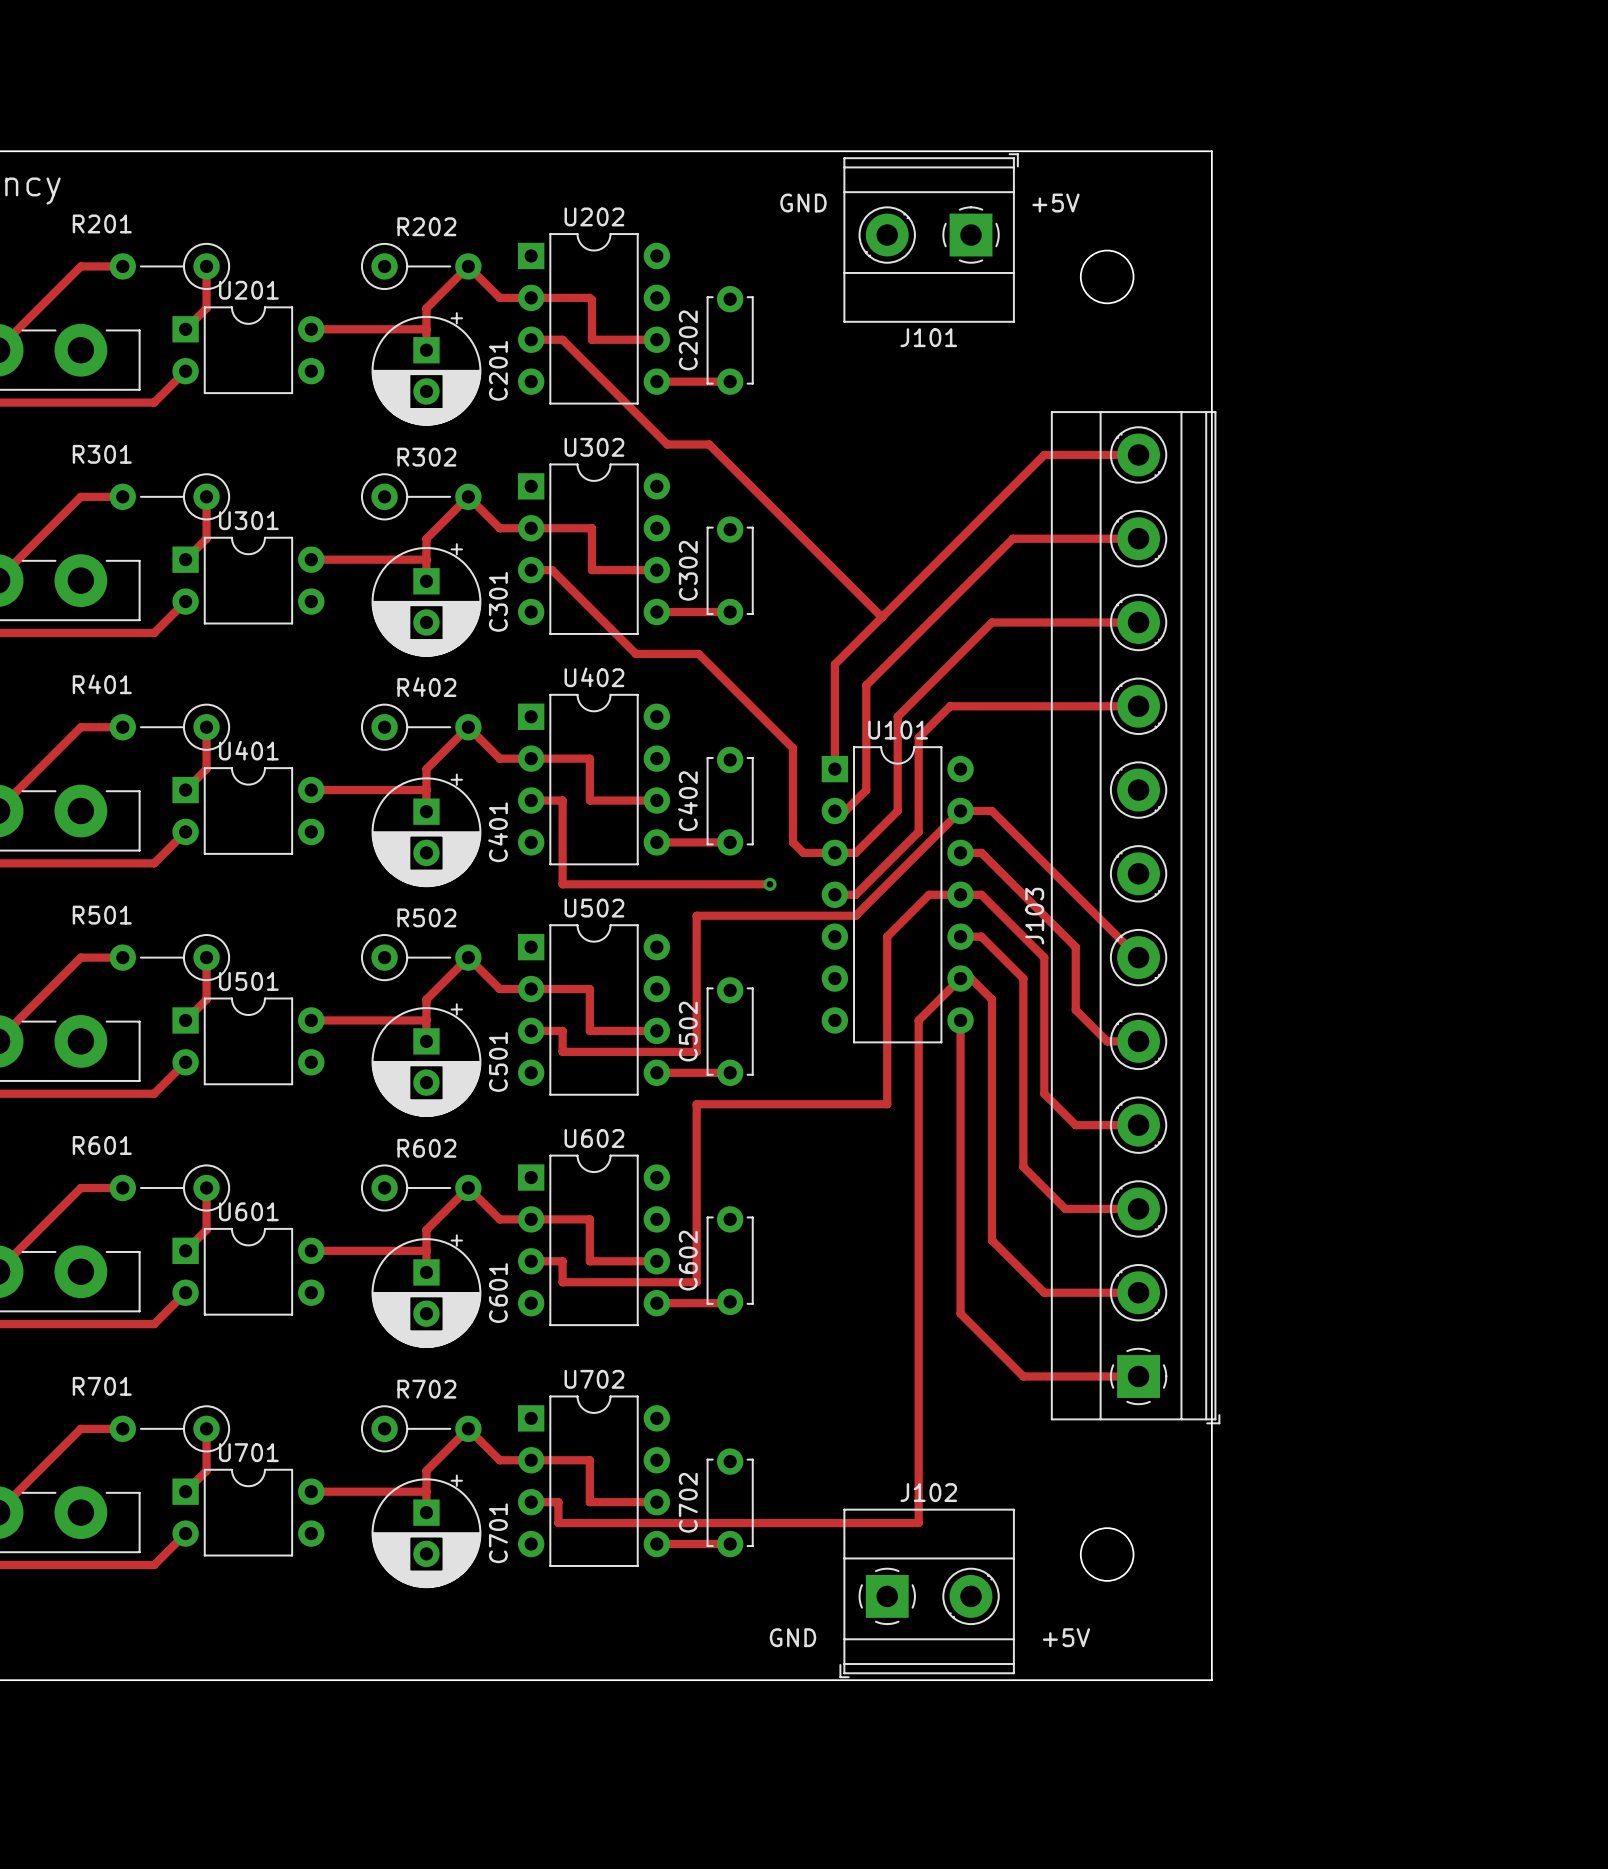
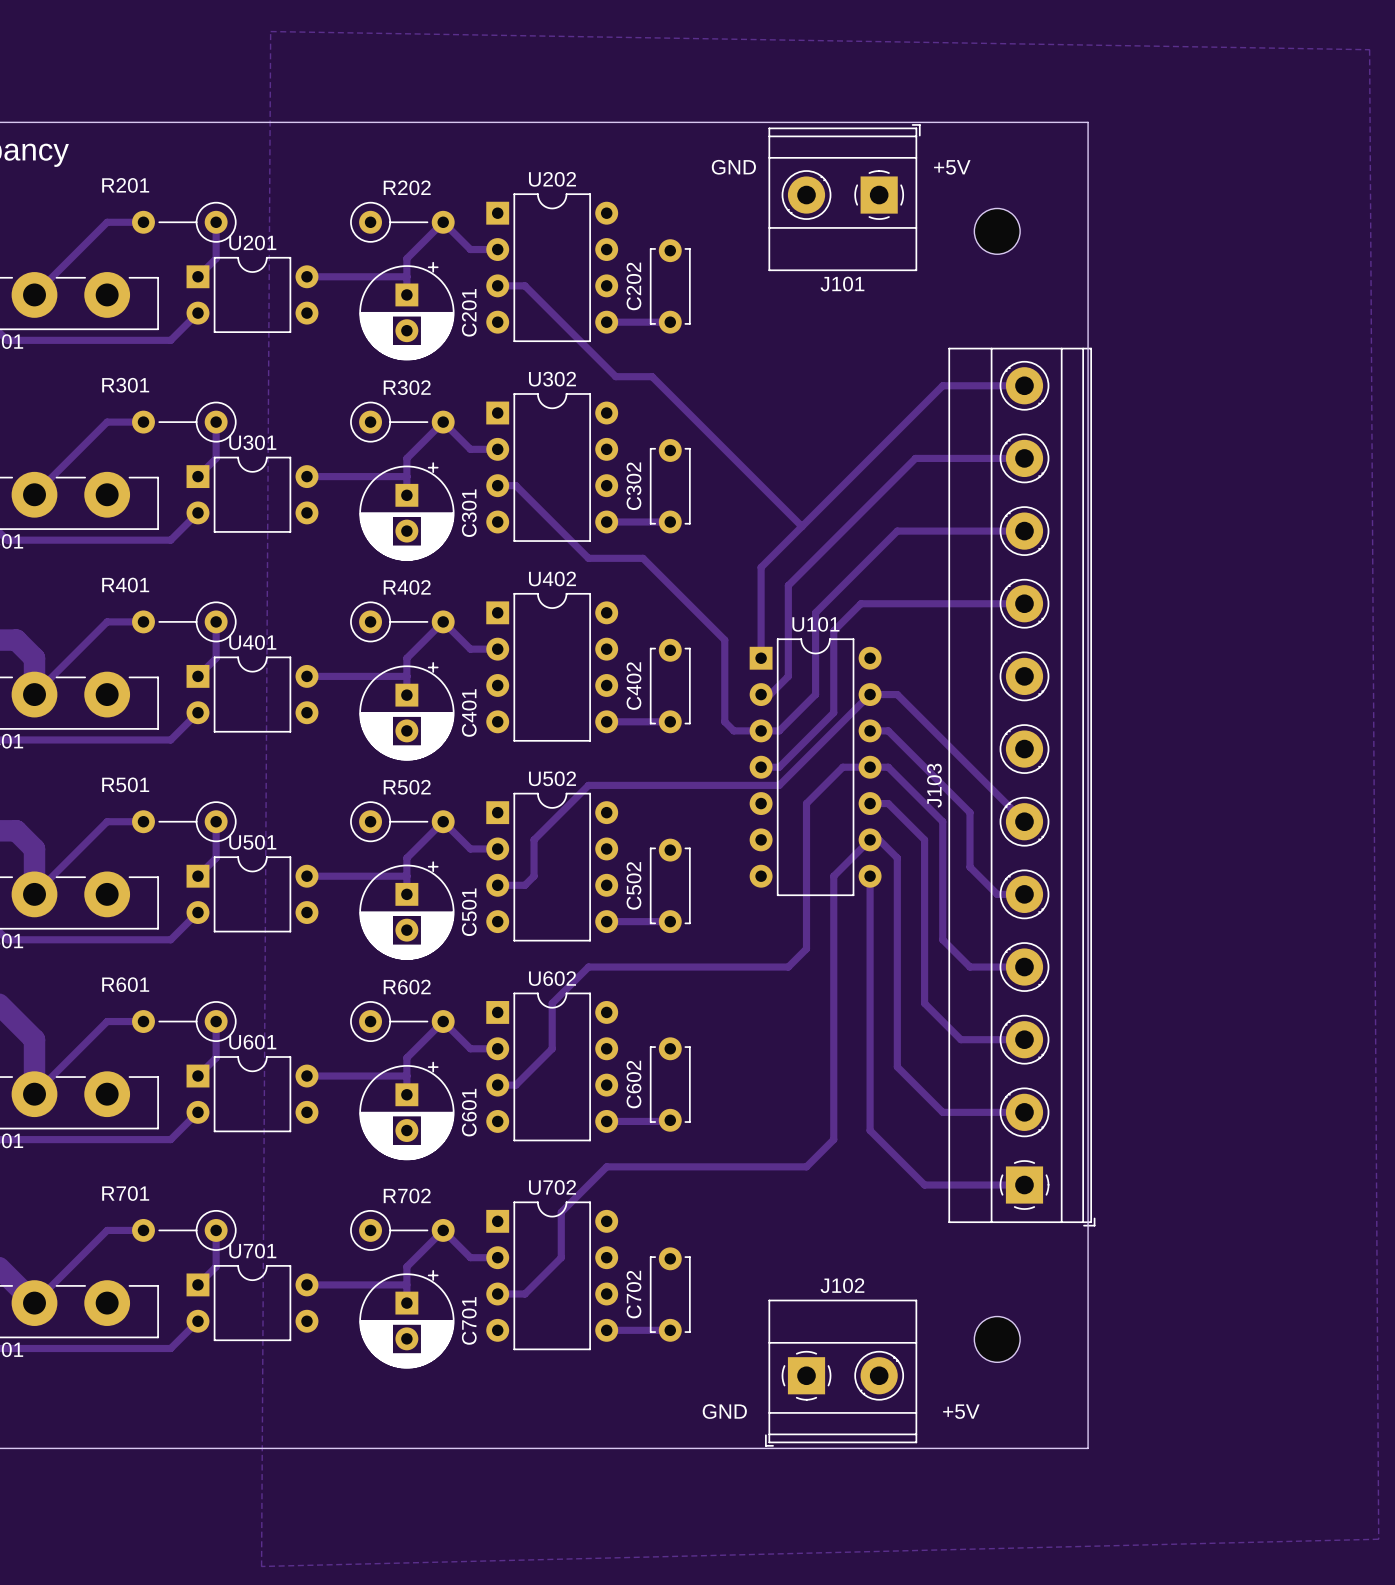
zone outline: none -> (270, 31) (261, 1566) (1378, 1539) (1369, 49) (270, 31)
track: (531, 297) (589, 297) (591, 299) (591, 339) (656, 339) -> none
track: (531, 528) (591, 528) (591, 570) (656, 570) -> none
track: (531, 758) (589, 758) (589, 800) (656, 800) -> none
track: (531, 800) (562, 800) (562, 884) (769, 884) -> none
via: (769, 884) -> none
track: (696, 915) (696, 1051) (562, 1051) (562, 1030) -> (641, 785) (588, 785) (534, 839) (534, 876) (524, 885)
track: (531, 989) (589, 989) (589, 1030) (656, 1030) -> none
track: (887, 1104) (696, 1104) (696, 1282) (562, 1282) (562, 1261) (552, 1261) -> (806, 948) (788, 967) (588, 967) (552, 1003) (552, 1048) (515, 1085)
track: (531, 1219) (589, 1219) (589, 1261) (656, 1261) -> none
track: (918, 1324) (918, 1523) (558, 1523) (558, 1502) -> (833, 1139) (806, 1166) (606, 1166) (561, 1212) (561, 1257) (524, 1294) (521, 1294)
track: (531, 1460) (589, 1460) (589, 1502) (656, 1502) -> none

